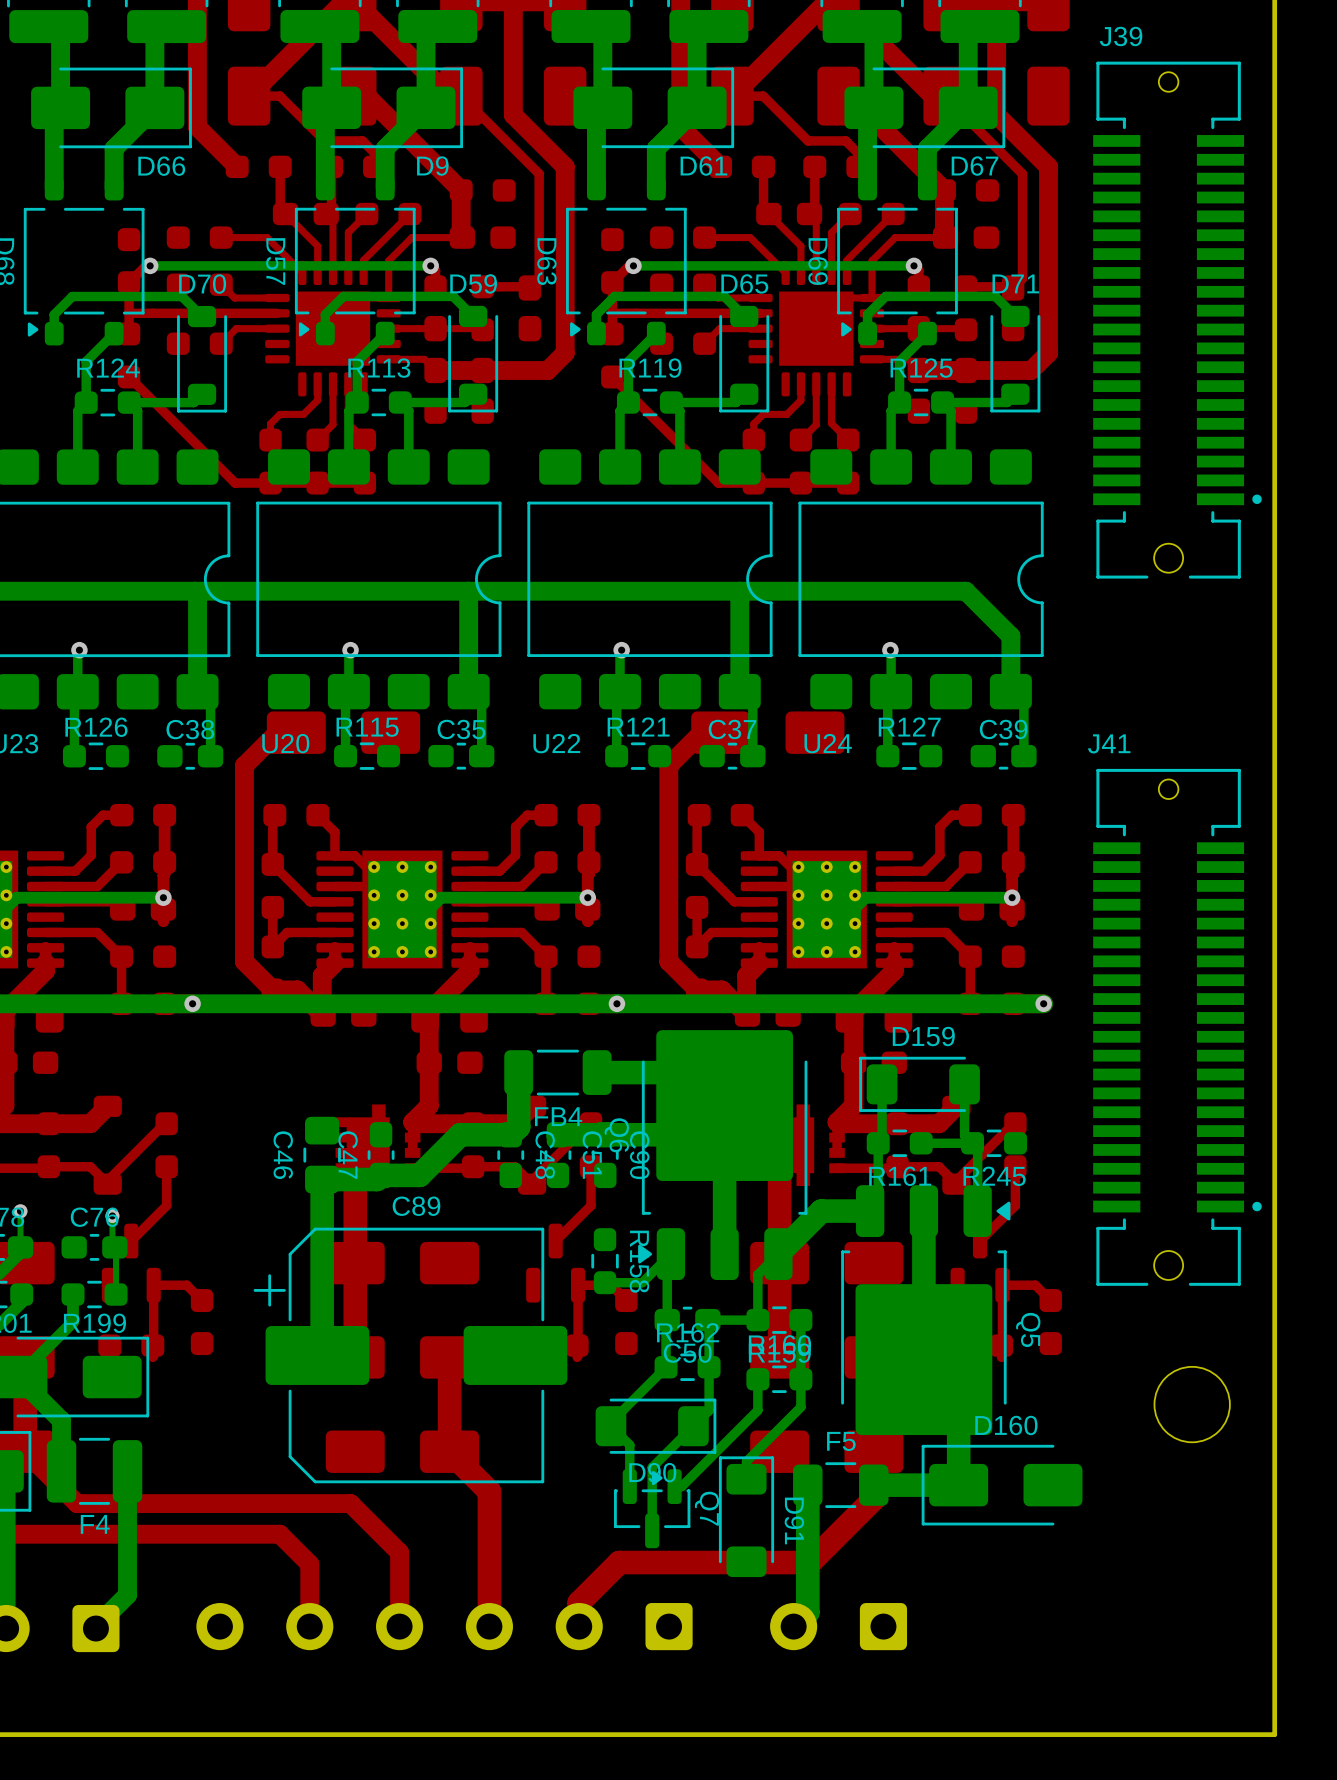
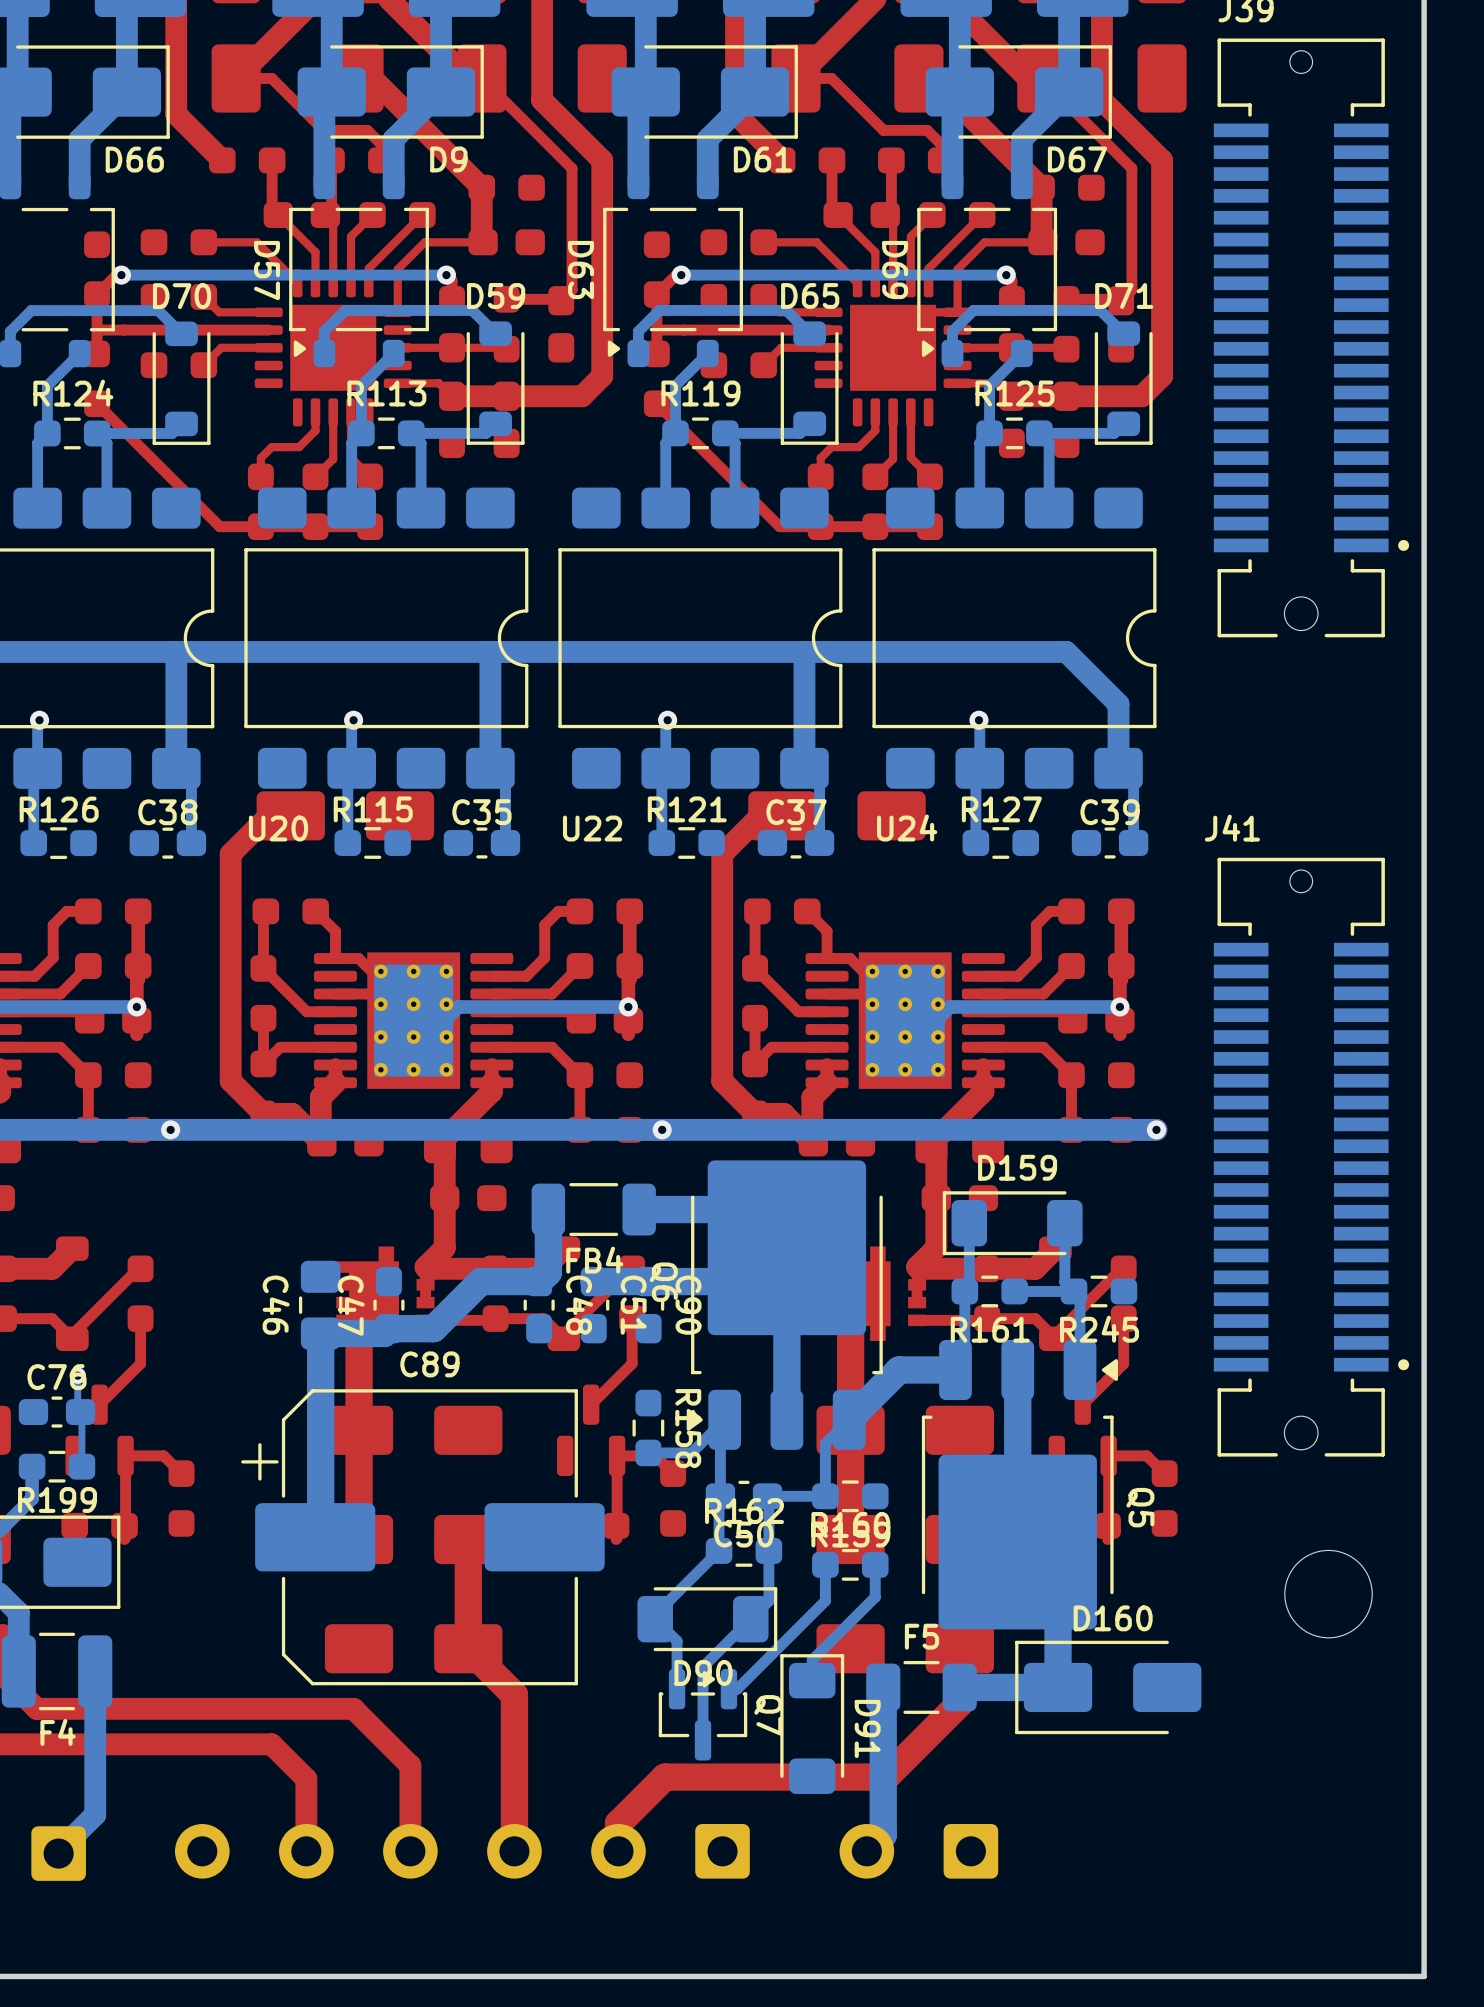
bottom track: (800, 1320) (800, 1379) -> none

